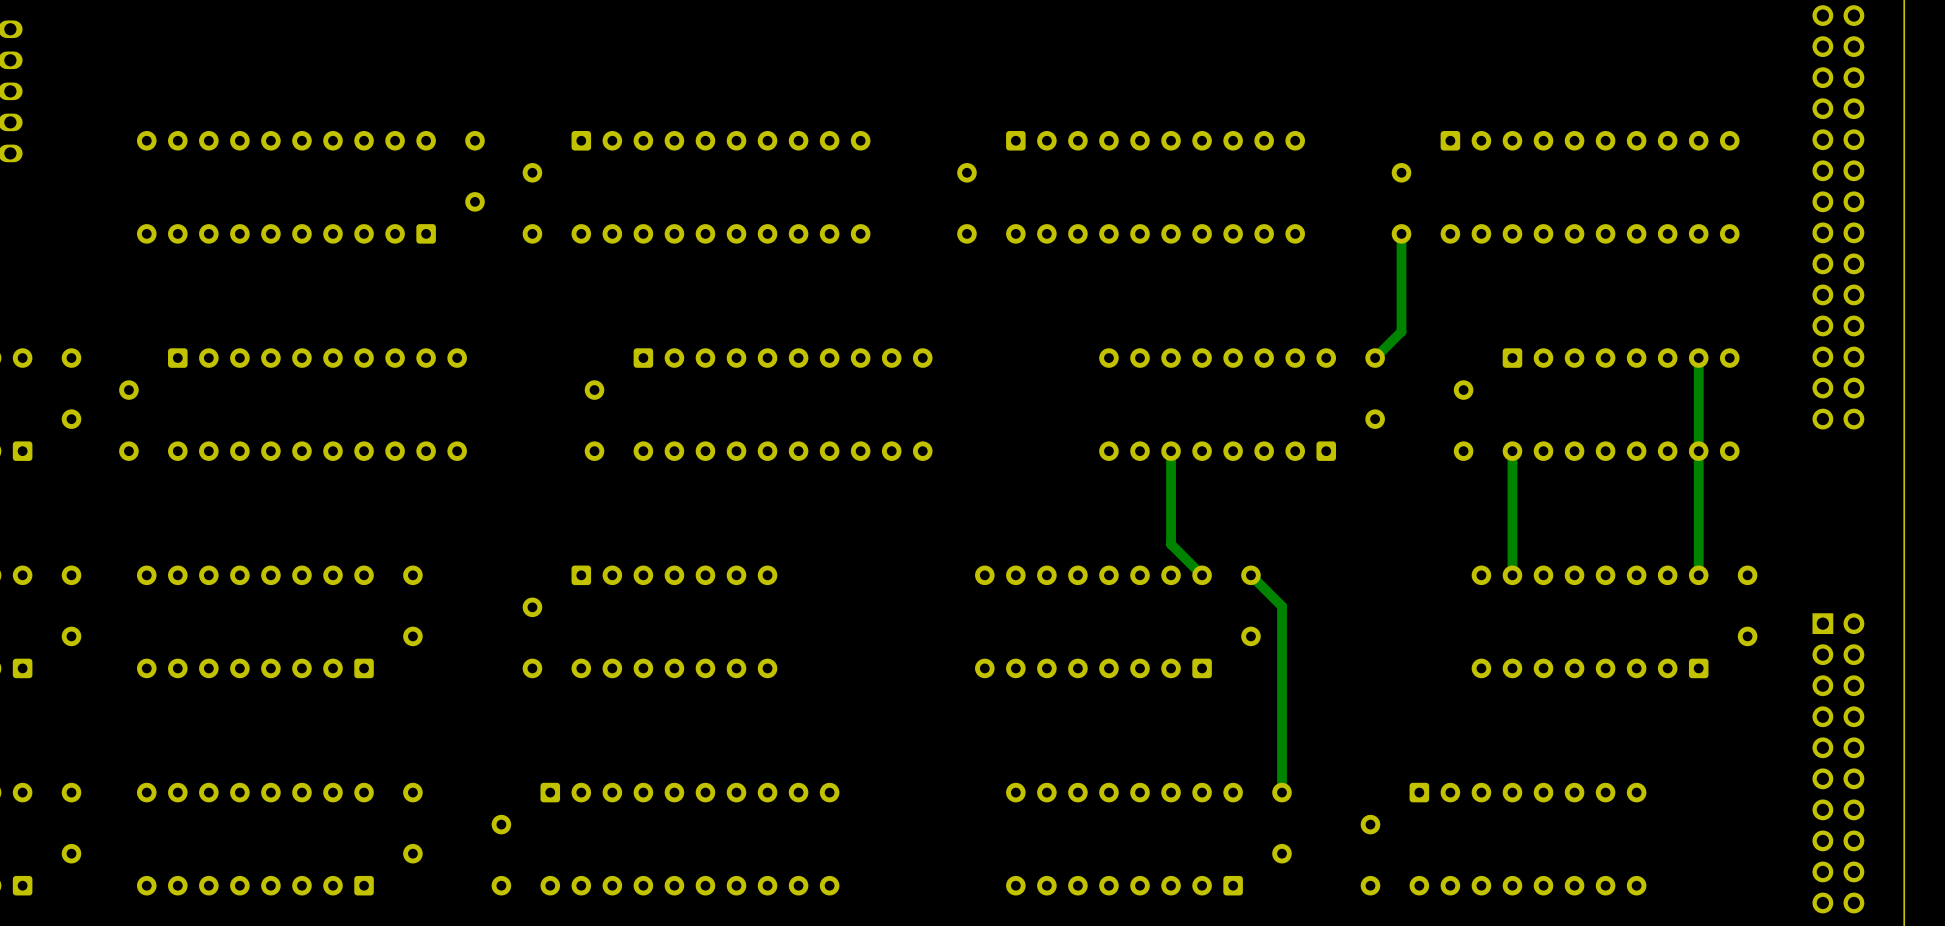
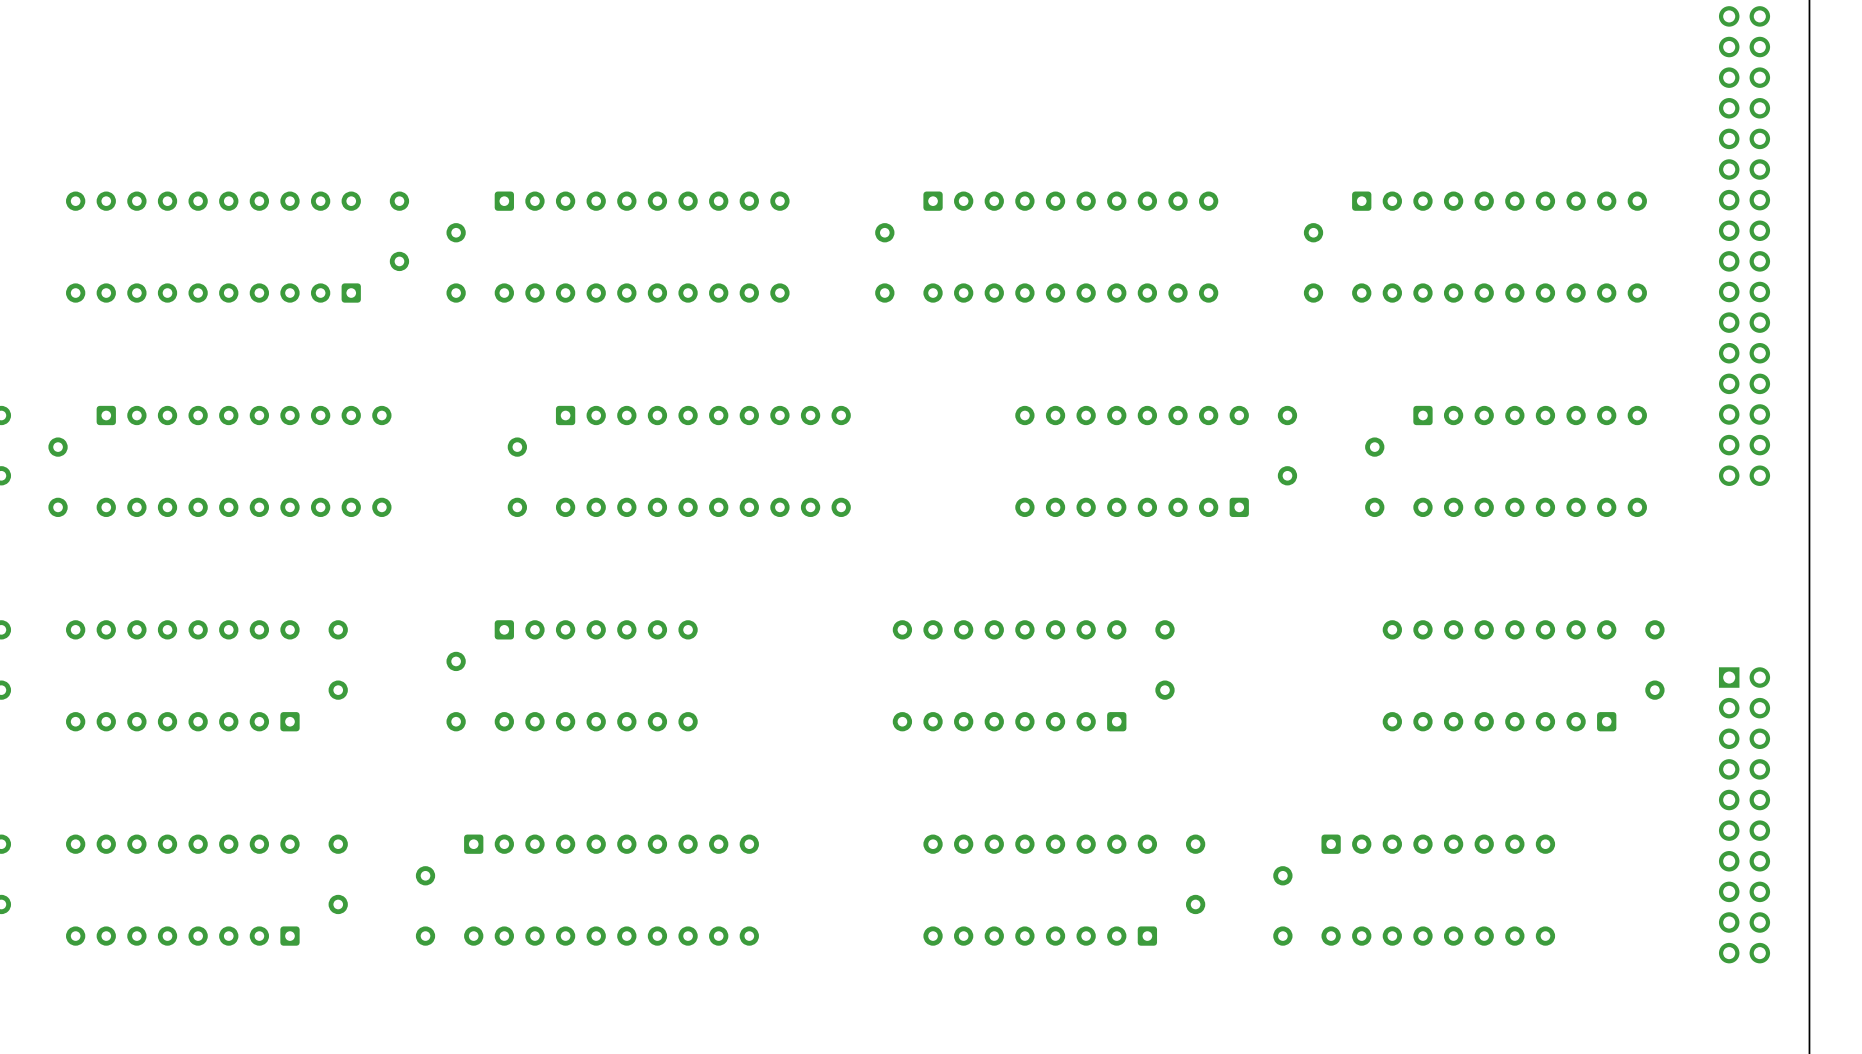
track: (1401, 233) (1401, 331) (1375, 358) -> none
track: (1698, 358) (1698, 575) -> none
track: (1171, 451) (1171, 544) (1202, 575) -> none
track: (1512, 451) (1512, 575) -> none
track: (1250, 575) (1282, 606) (1282, 792) -> none

